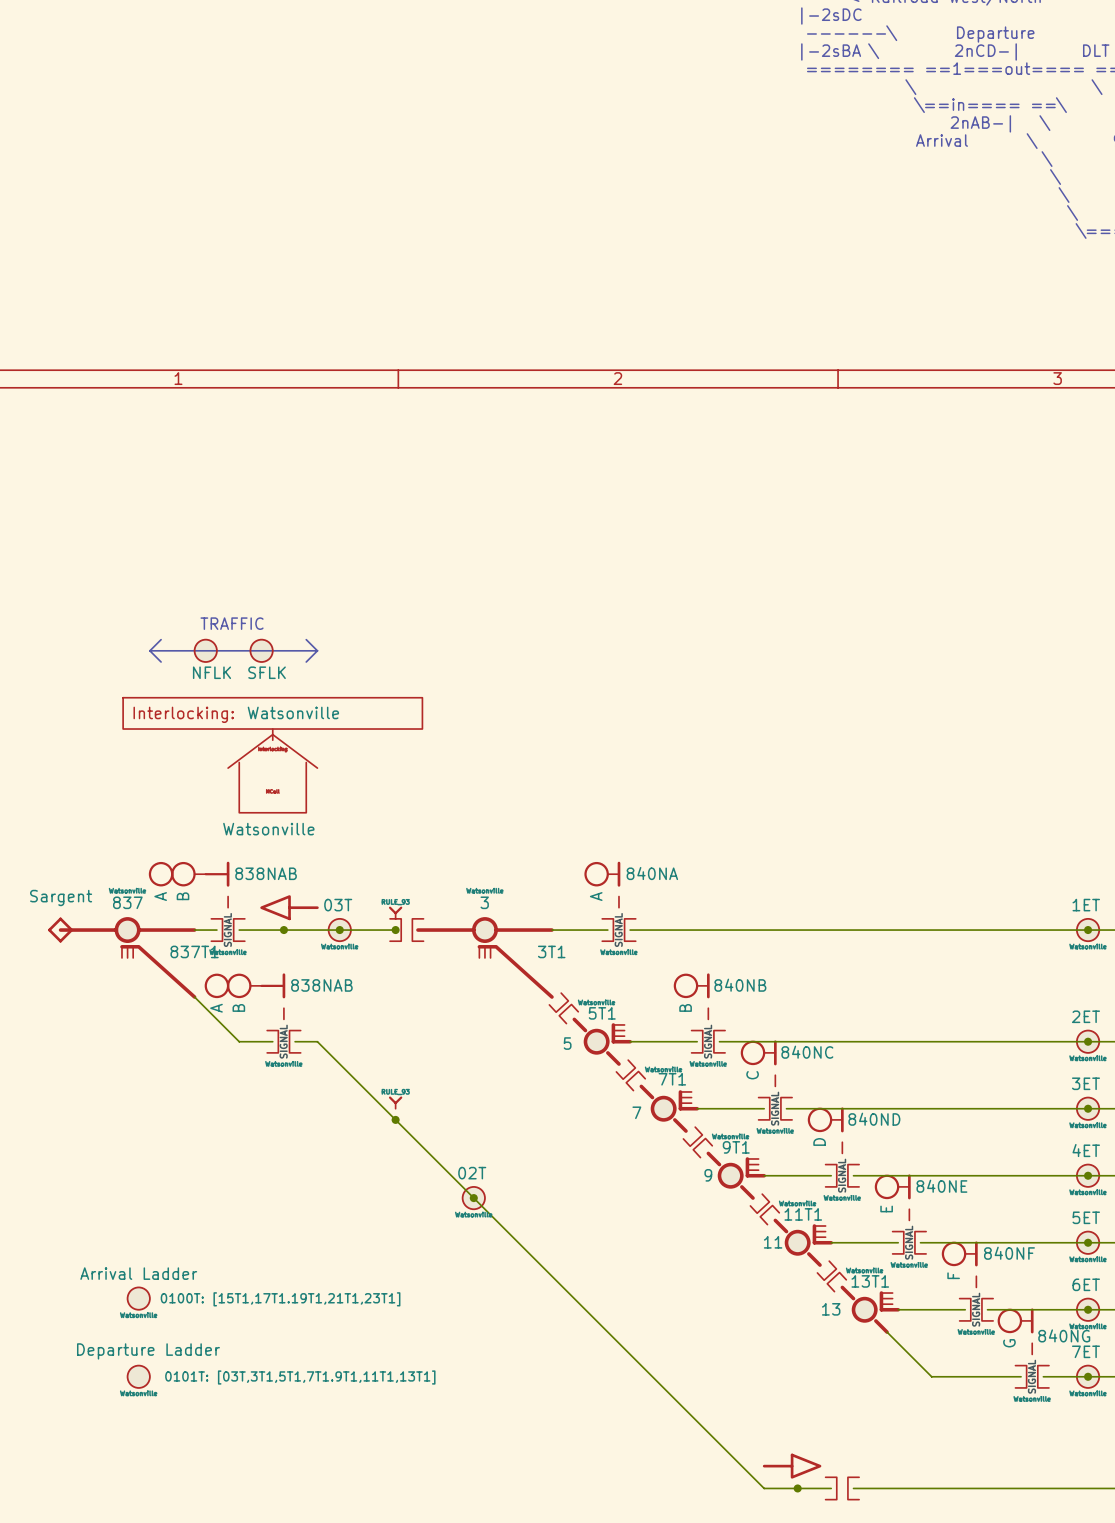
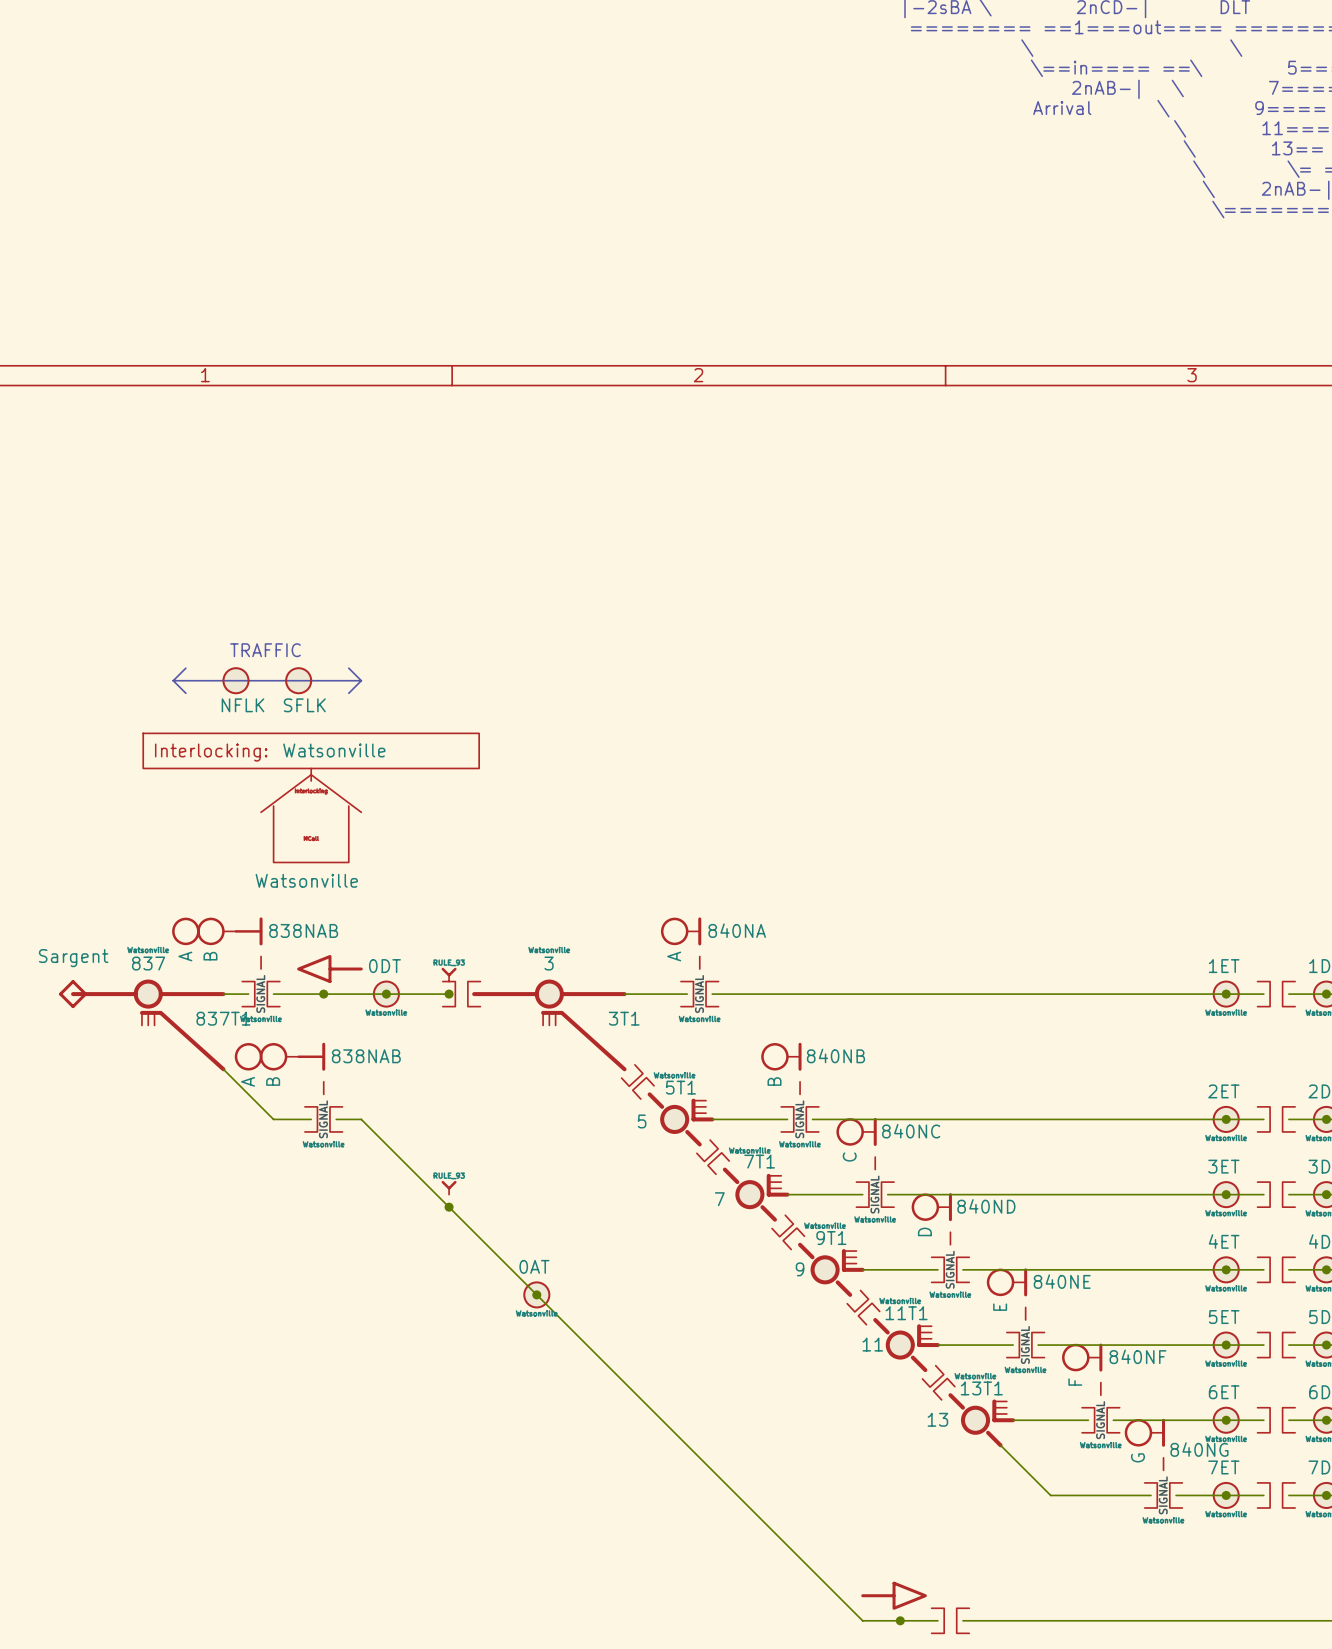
part value: 03T (338, 905) -> 0DT (384, 966)
part value: 02T (472, 1173) -> 0AT (534, 1266)
part: (138, 1298) -> none
part: (138, 1376) -> none

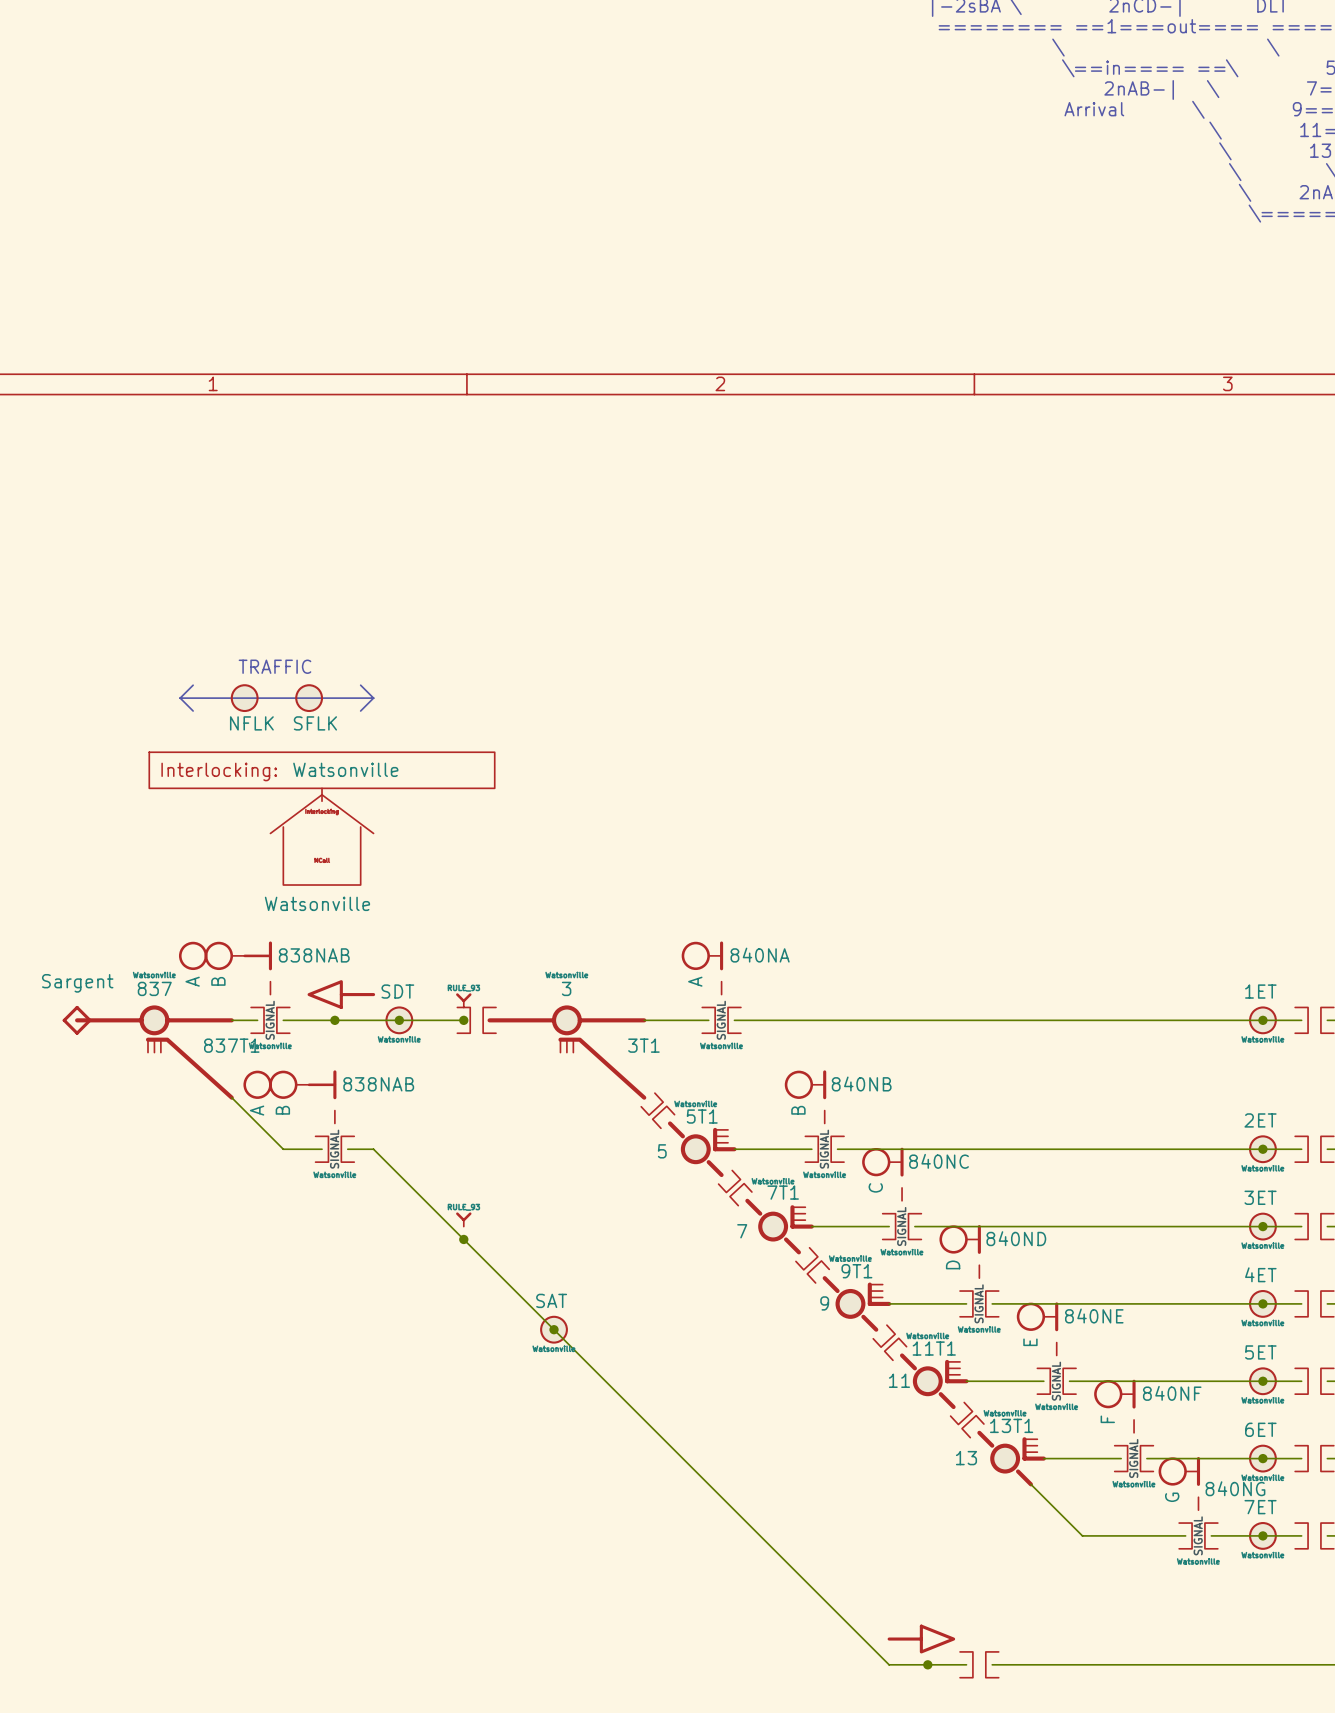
part value: 0DT (384, 966) -> SDT (397, 991)
part value: 0AT (534, 1266) -> SAT (551, 1300)

